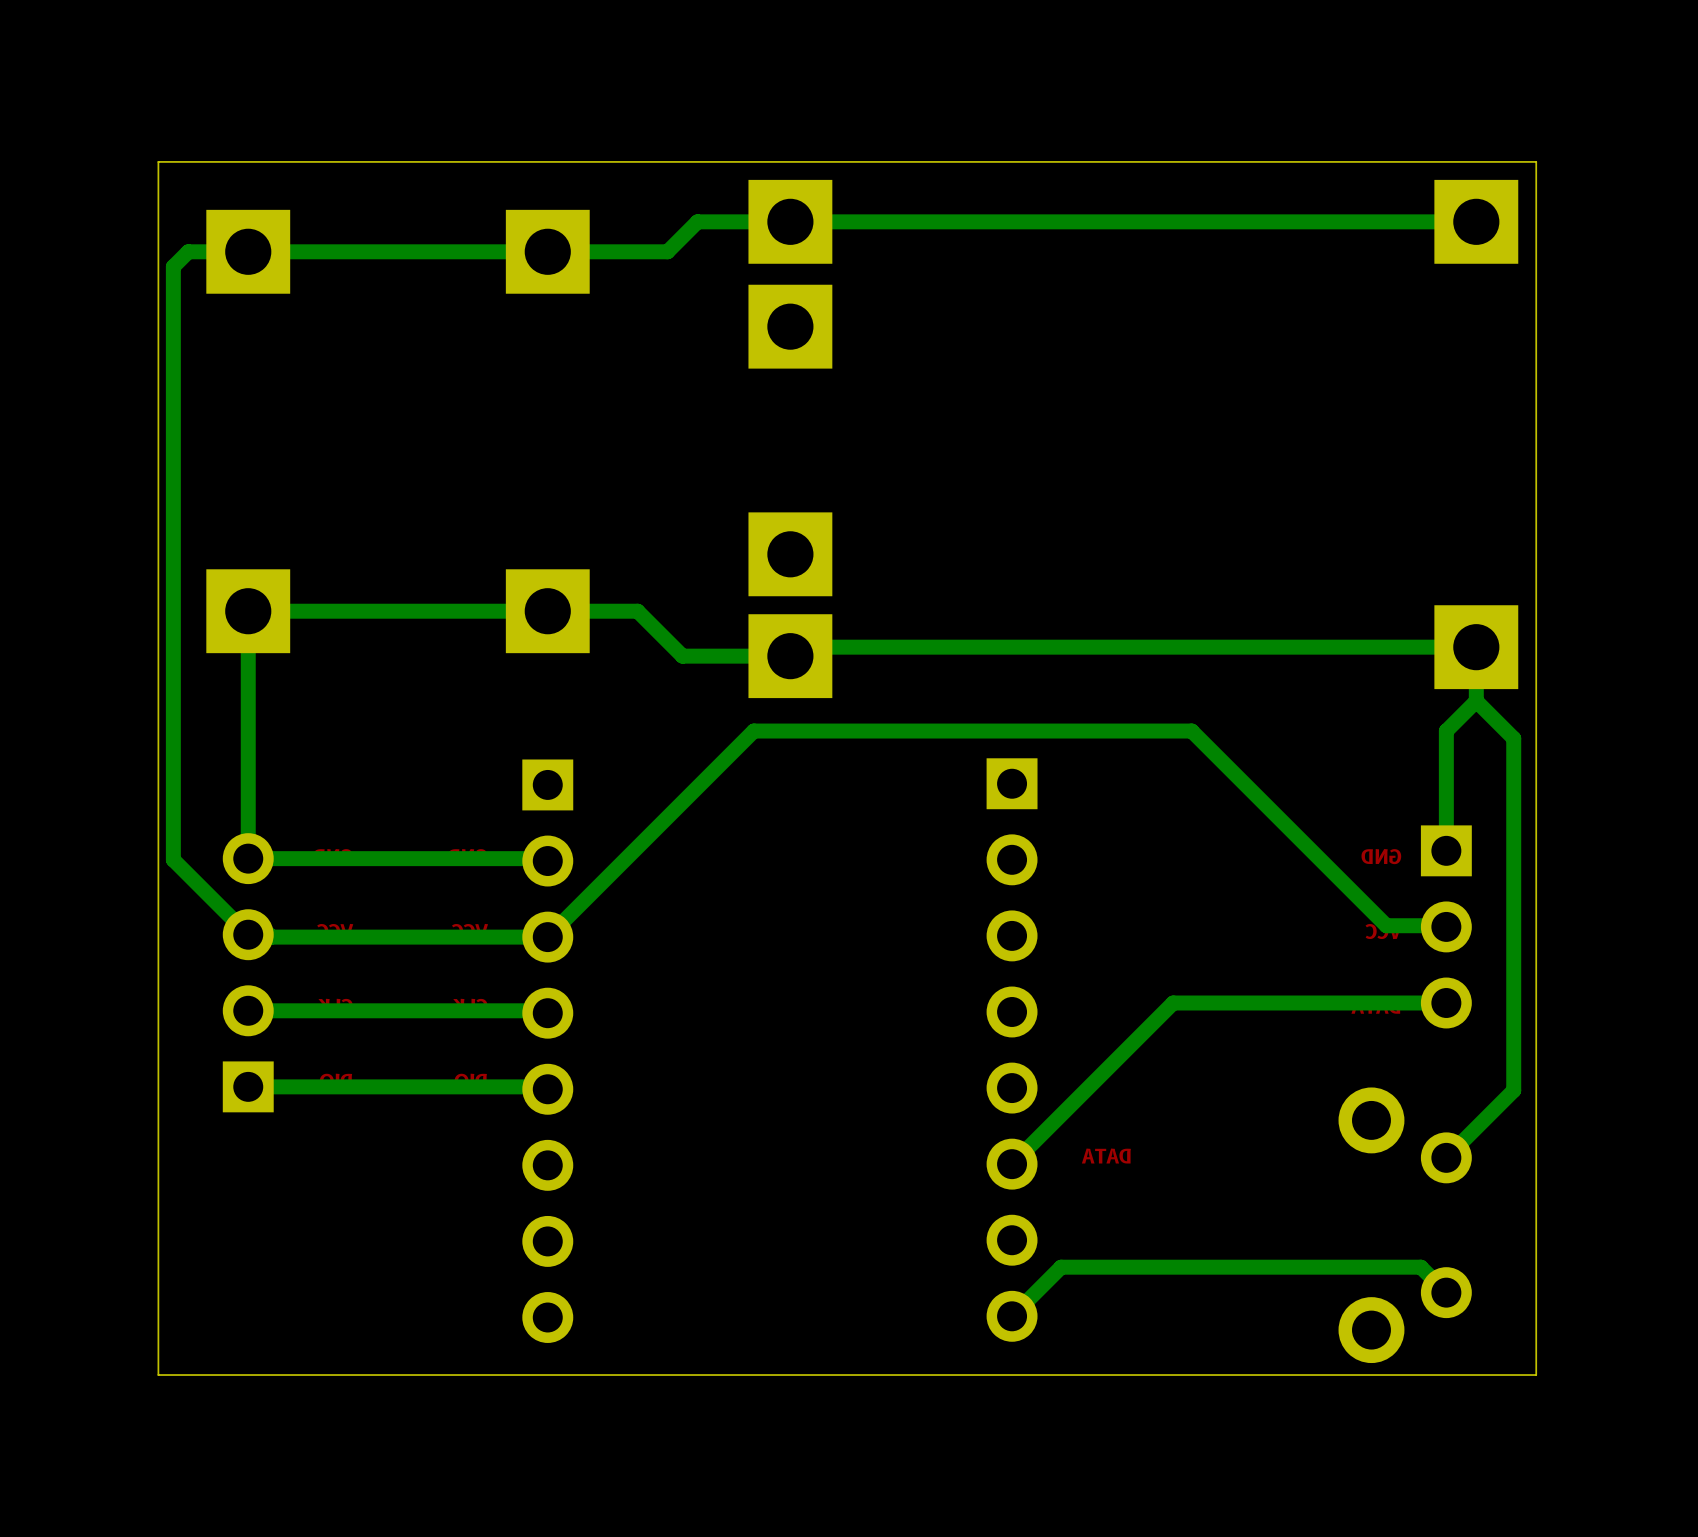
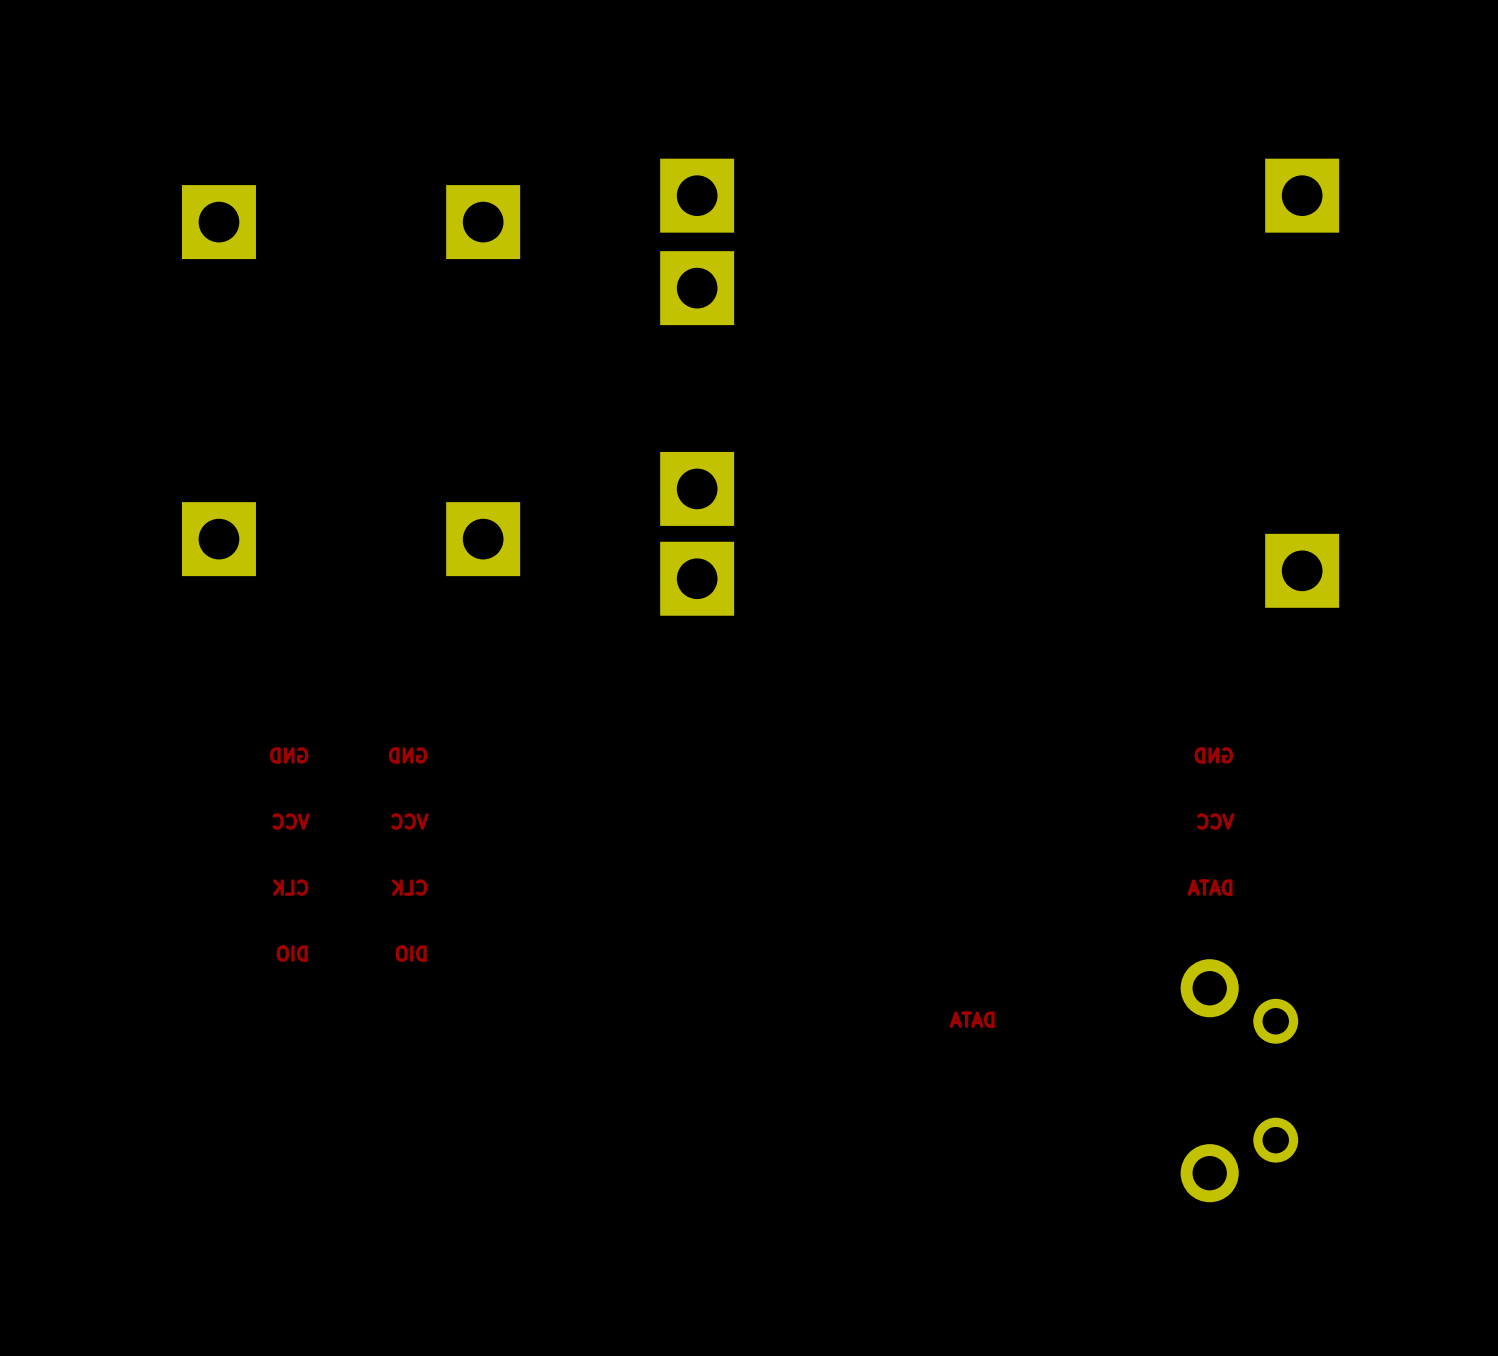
board edge: (1536, 161) (158, 161) (158, 1375) (1536, 1375) (1536, 161) -> none
bottom track: (1476, 221) (697, 221) (667, 251) (188, 251) (173, 266) (173, 859) (248, 934) (269, 934) (271, 937) (547, 937) (753, 731) (1191, 731) (1386, 925) (1446, 926) -> none
bottom track: (1476, 701) (1446, 731) (1446, 850) -> none
bottom track: (1476, 701) (1513, 738) (1513, 1090) (1446, 1157) -> none
bottom track: (1476, 701) (1476, 647) (799, 647) (790, 656) (682, 656) (637, 611) (248, 611) (248, 858) (545, 858) (547, 861) -> none
part: (1446, 926) -> none
part: (248, 972) -> none
bottom track: (1446, 1003) (1173, 1003) (1012, 1164) -> none
bottom track: (248, 1010) (545, 1010) (547, 1013) -> none
part: (1012, 1050) -> none
part: (547, 1051) -> none
bottom track: (248, 1086) (545, 1086) (547, 1089) -> none
bottom track: (1446, 1292) (1420, 1267) (1061, 1267) (1012, 1316) -> none

